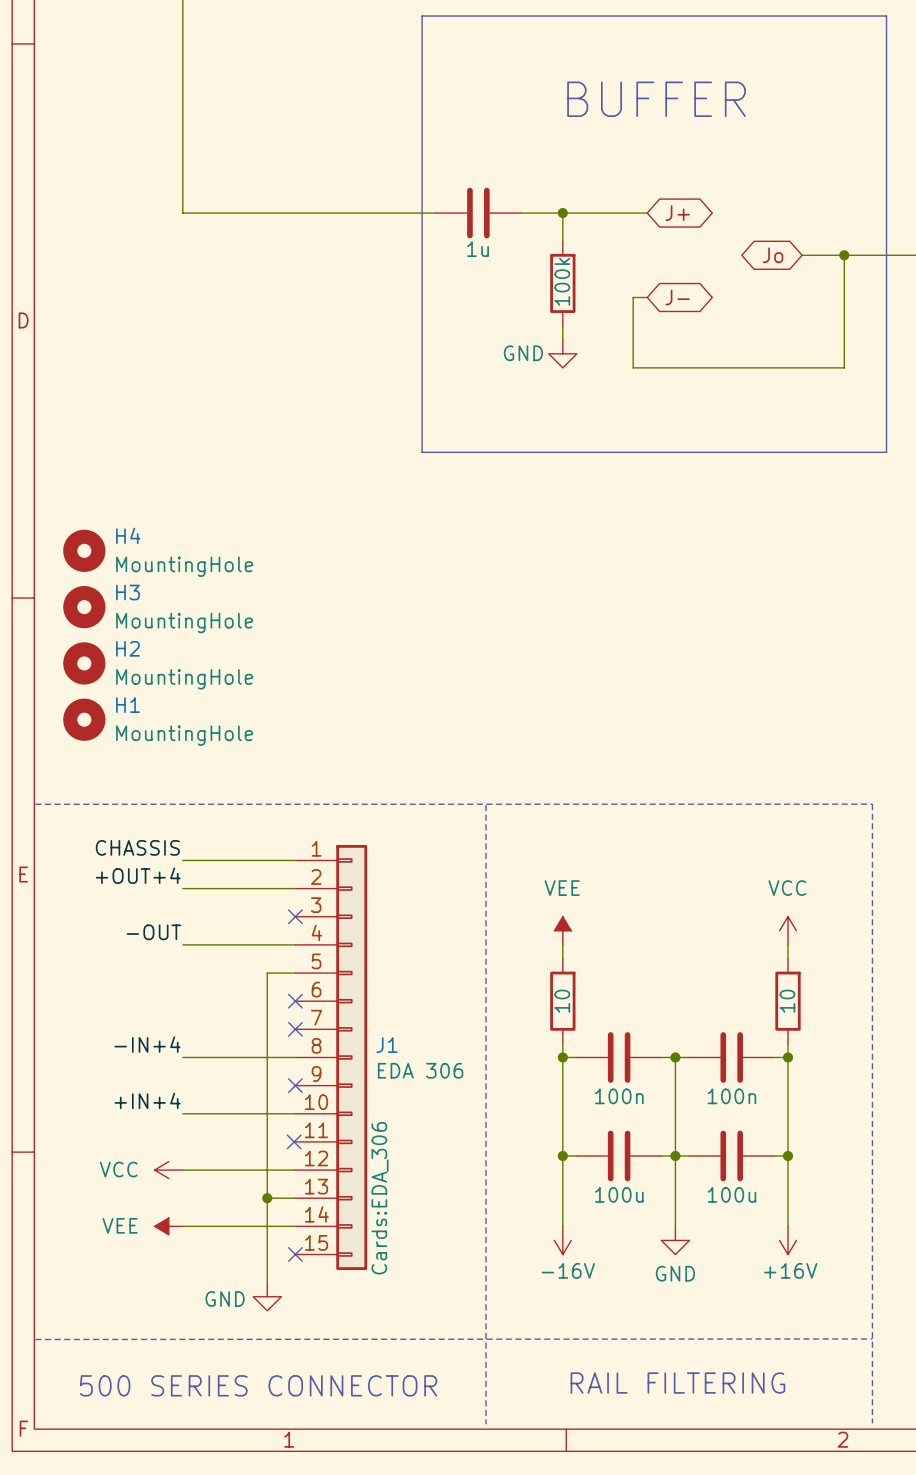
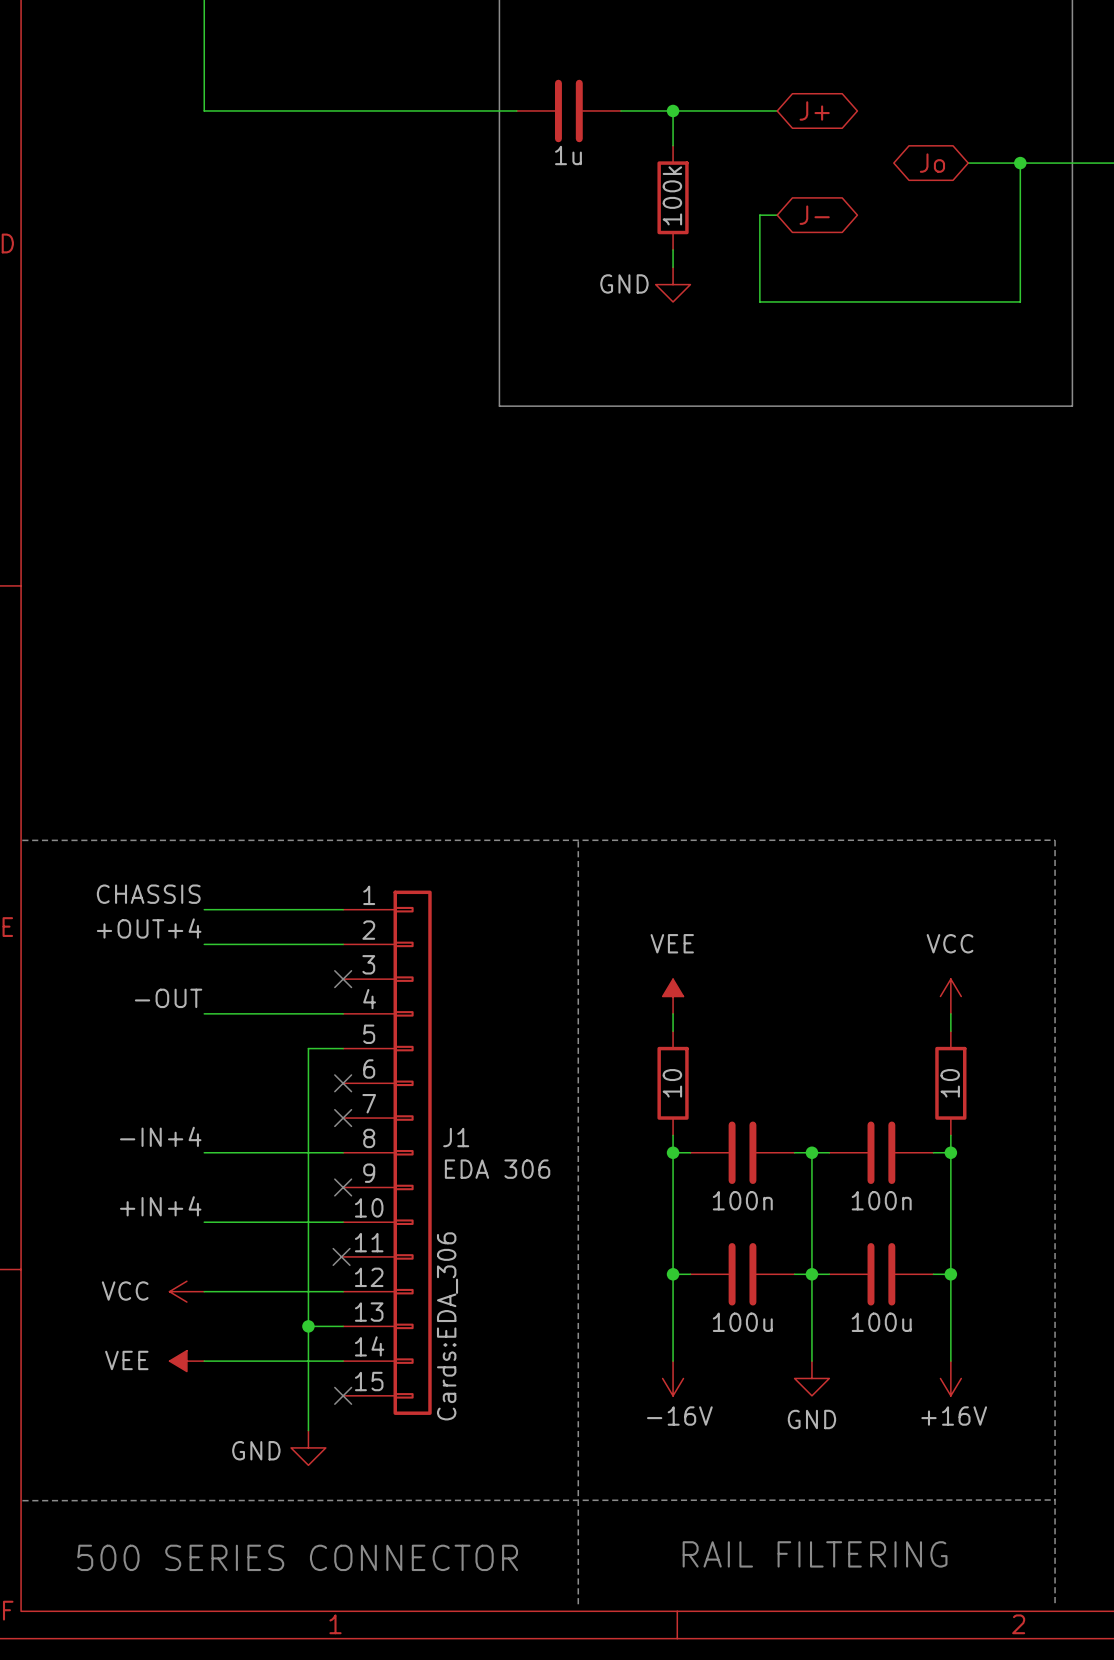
H4: MountingHole (84, 550) -> none
H3: MountingHole (84, 607) -> none
H2: MountingHole (84, 663) -> none
H1: MountingHole (84, 719) -> none

